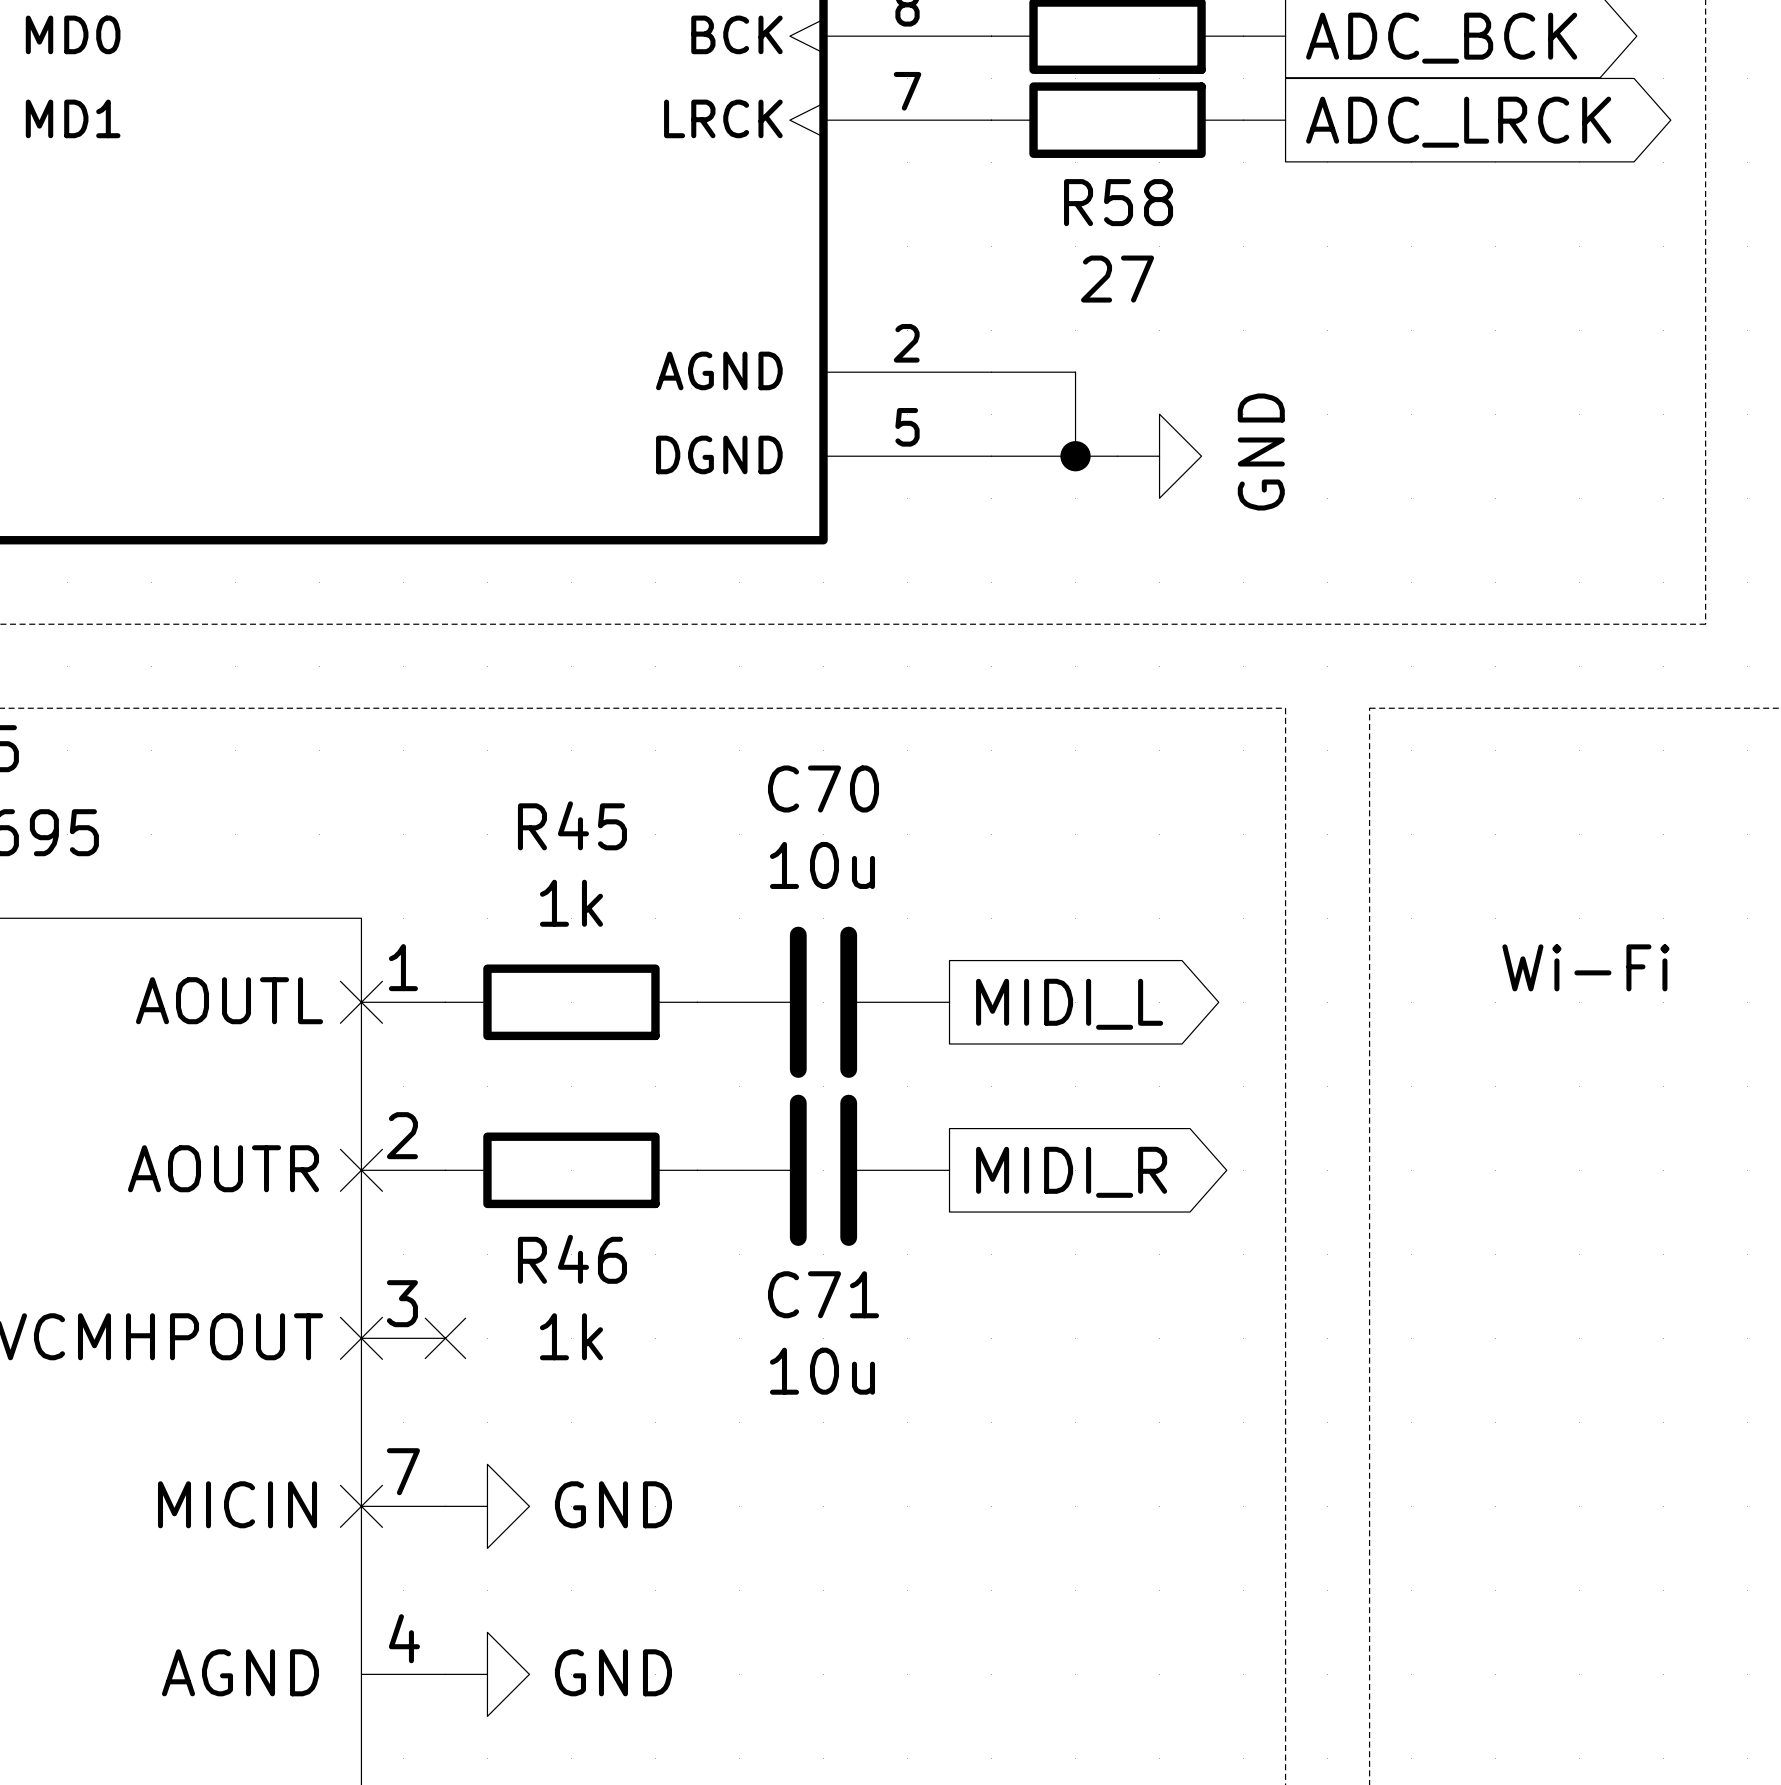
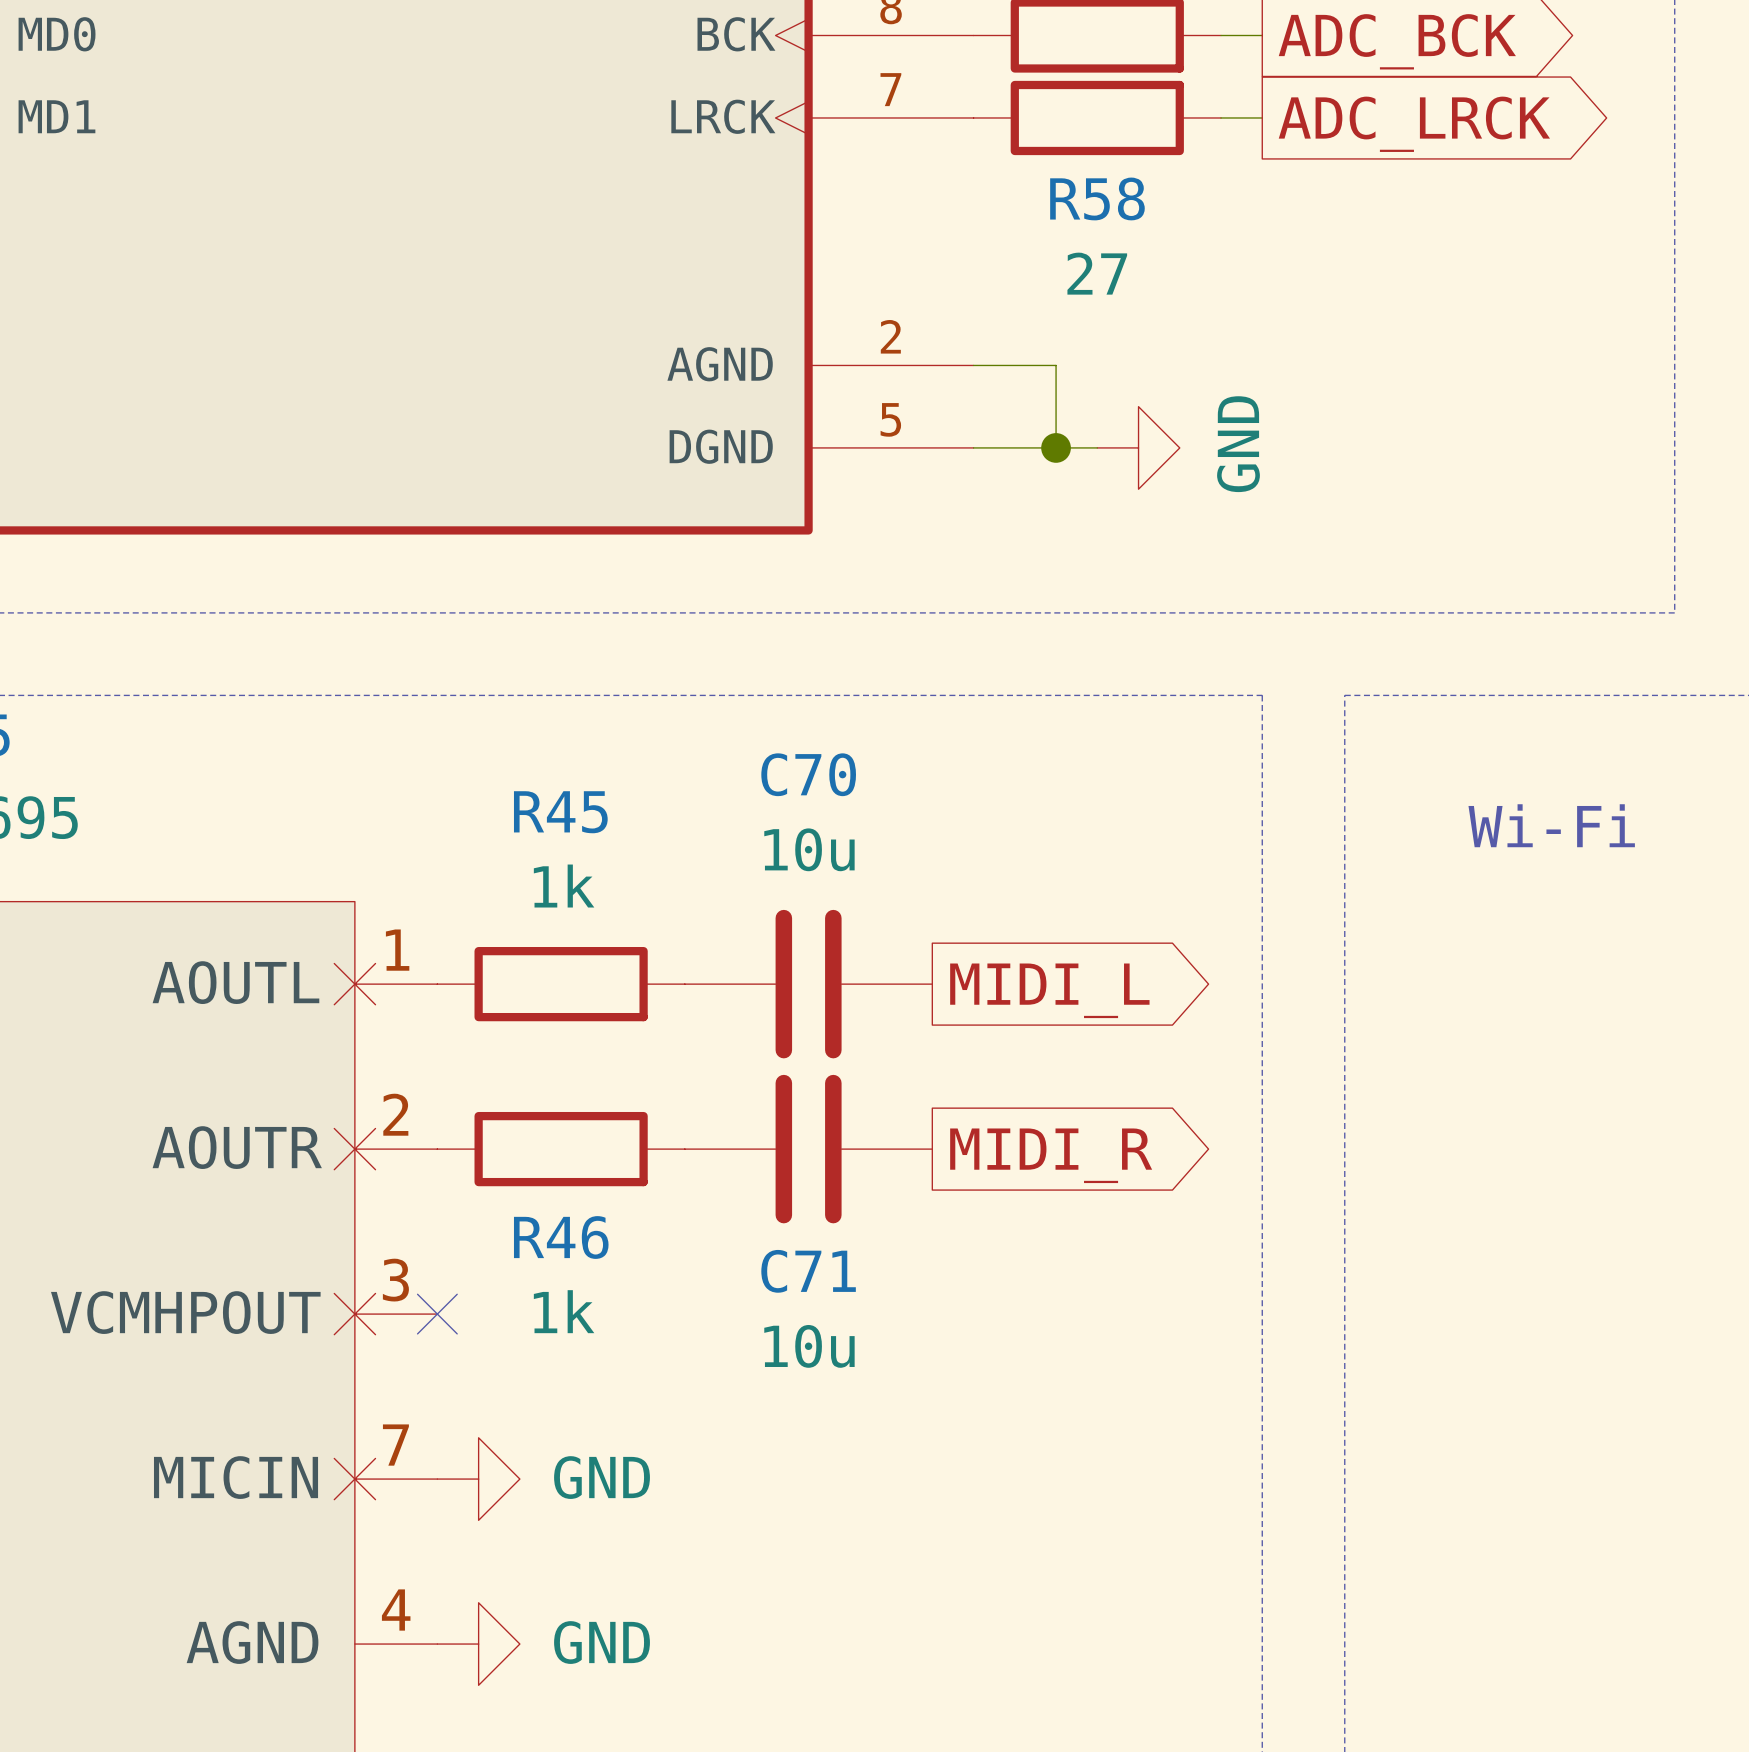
text position: Wi-Fi (1585, 967) -> Wi-Fi (1551, 825)

